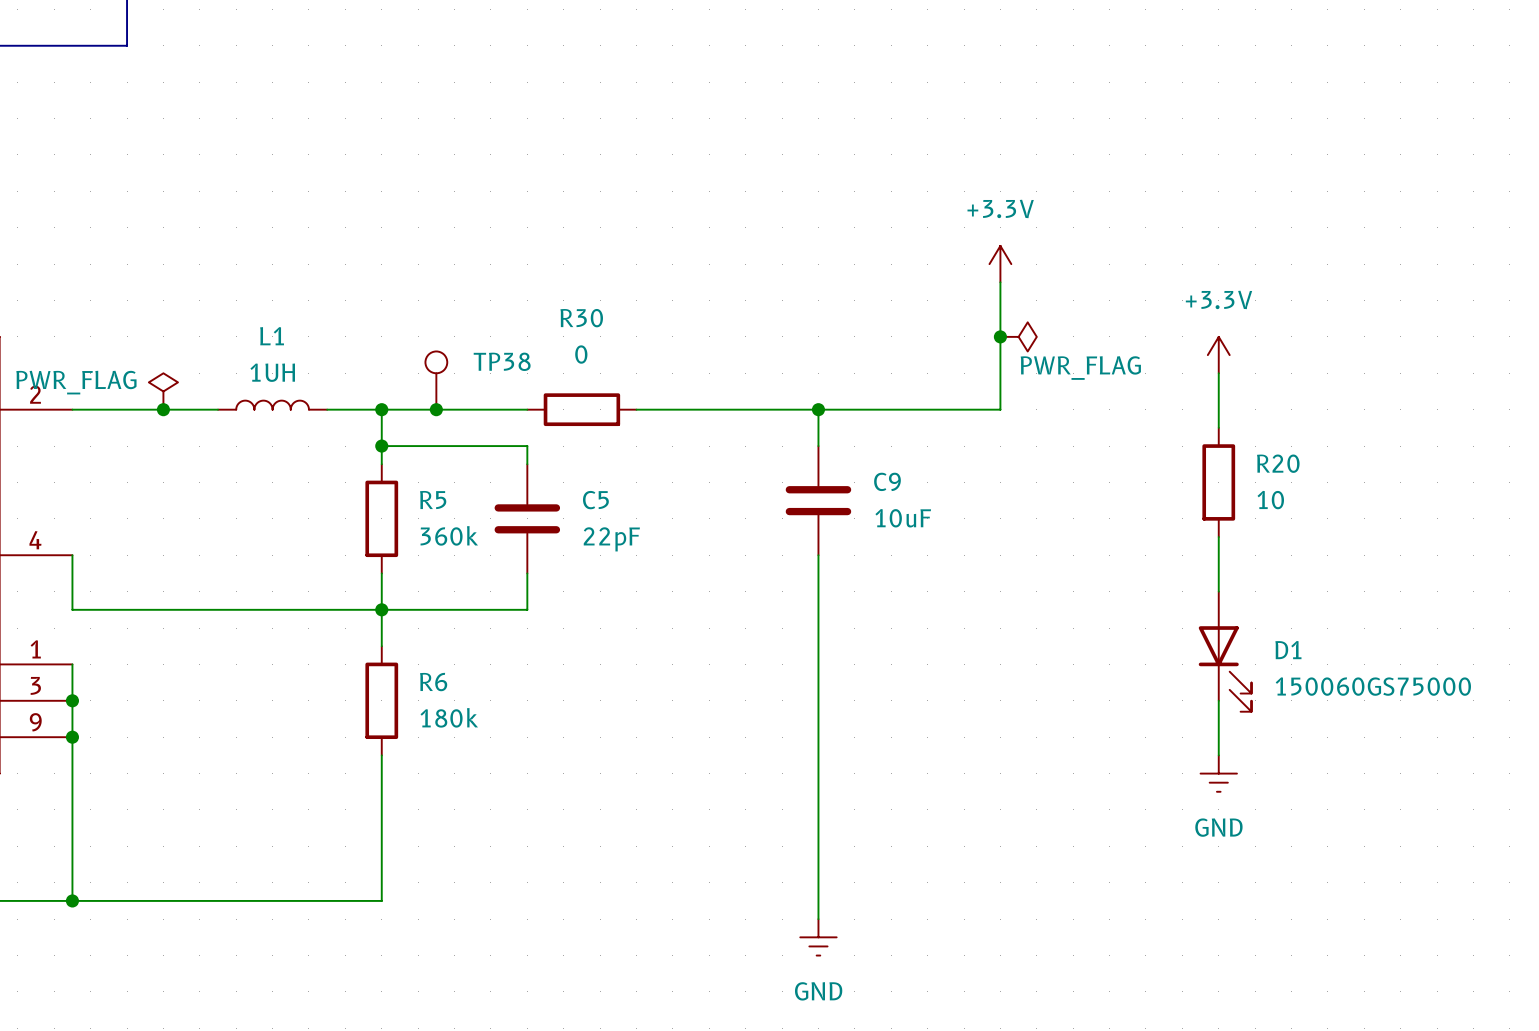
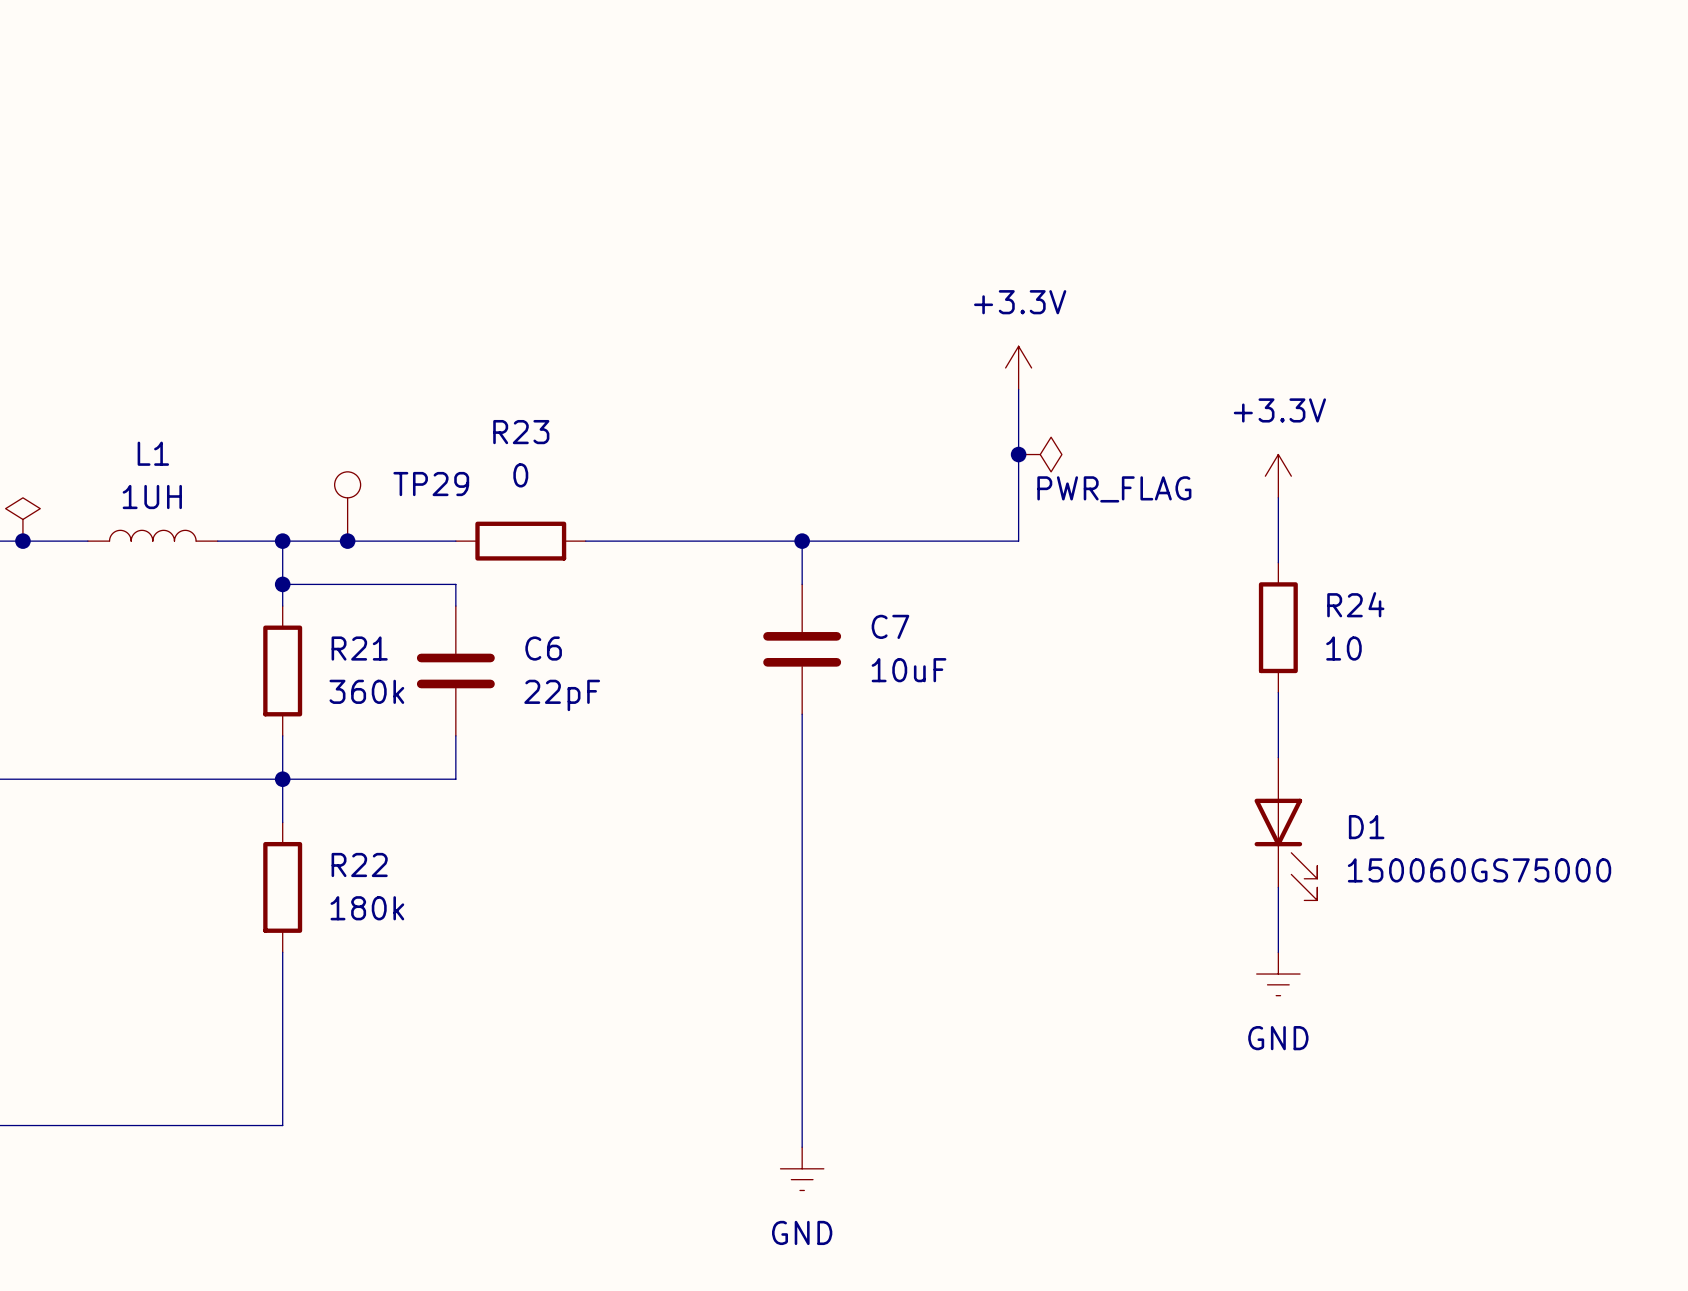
R30 name: R30 (581, 318) -> R23 (521, 432)
TP38 name: TP38 (502, 361) -> TP29 (431, 484)
R20 name: R20 (1278, 463) -> R24 (1355, 604)
C9 name: C9 (887, 481) -> C7 (890, 626)
R5 name: R5 (433, 500) -> R21 (359, 648)
C5 name: C5 (595, 500) -> C6 (543, 648)
R6 name: R6 (433, 682) -> R22 (359, 864)

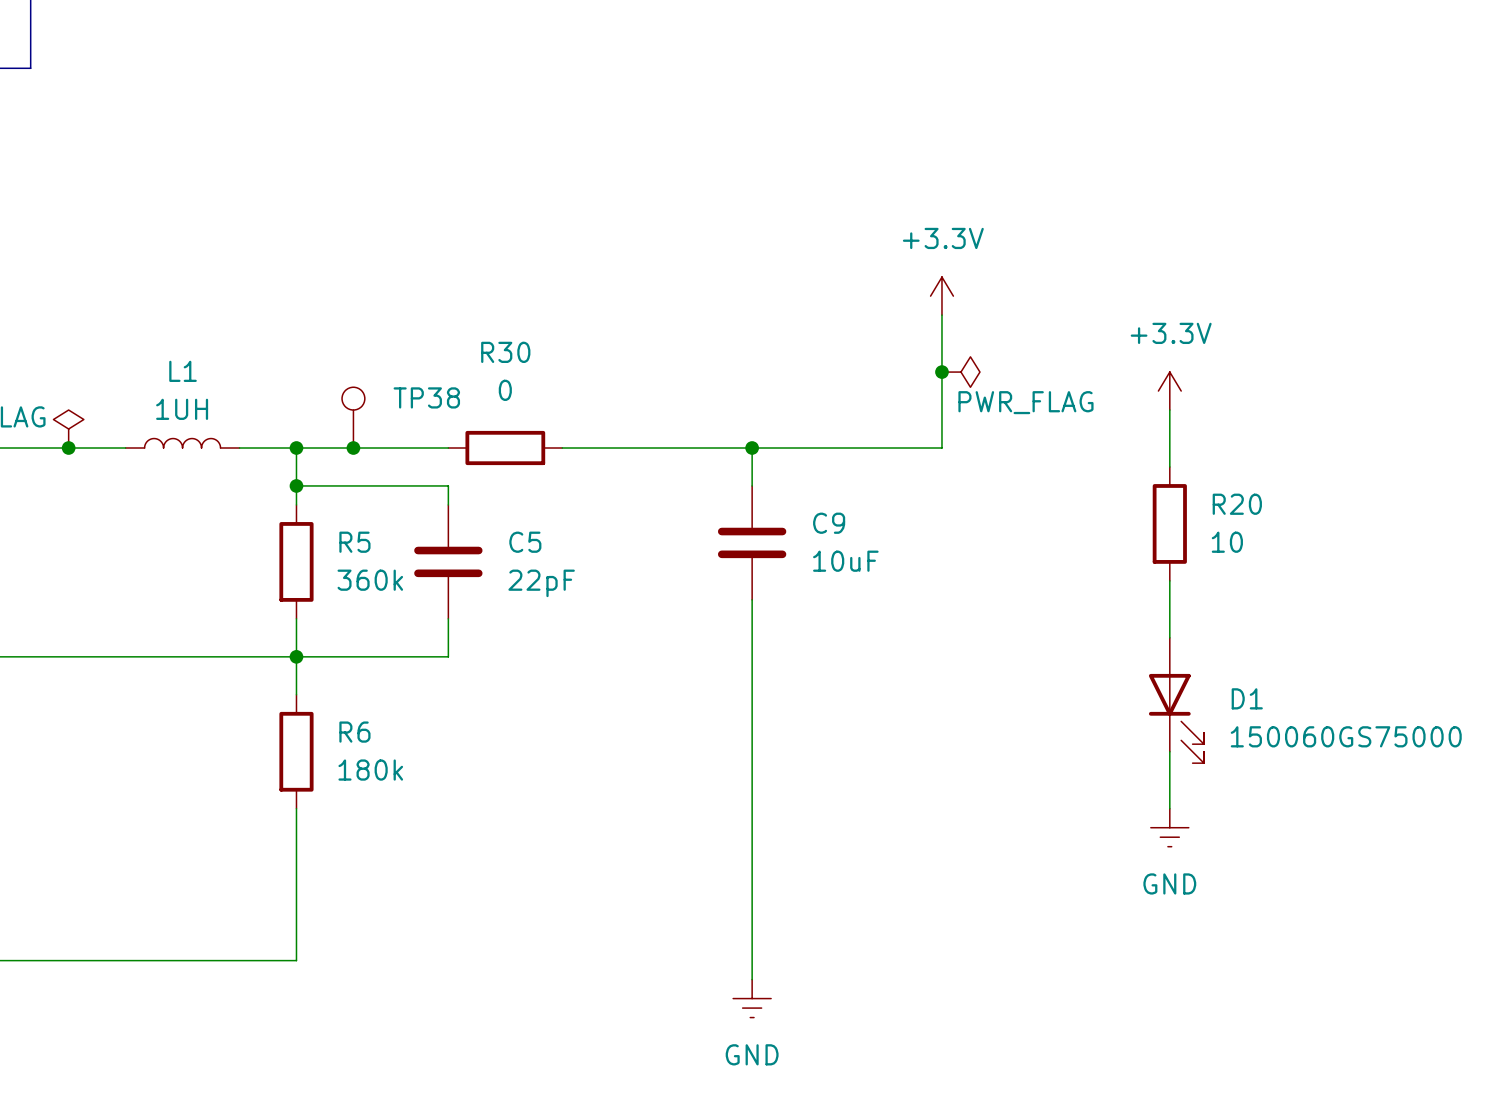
R23 name: R23 (521, 432) -> R30 (505, 352)
TP29 name: TP29 (431, 484) -> TP38 (426, 397)
R24 name: R24 (1355, 604) -> R20 (1237, 504)
C7 name: C7 (890, 626) -> C9 (829, 523)
R21 name: R21 (359, 648) -> R5 (354, 542)
C6 name: C6 (543, 648) -> C5 (525, 542)
R22 name: R22 (359, 864) -> R6 (354, 732)

